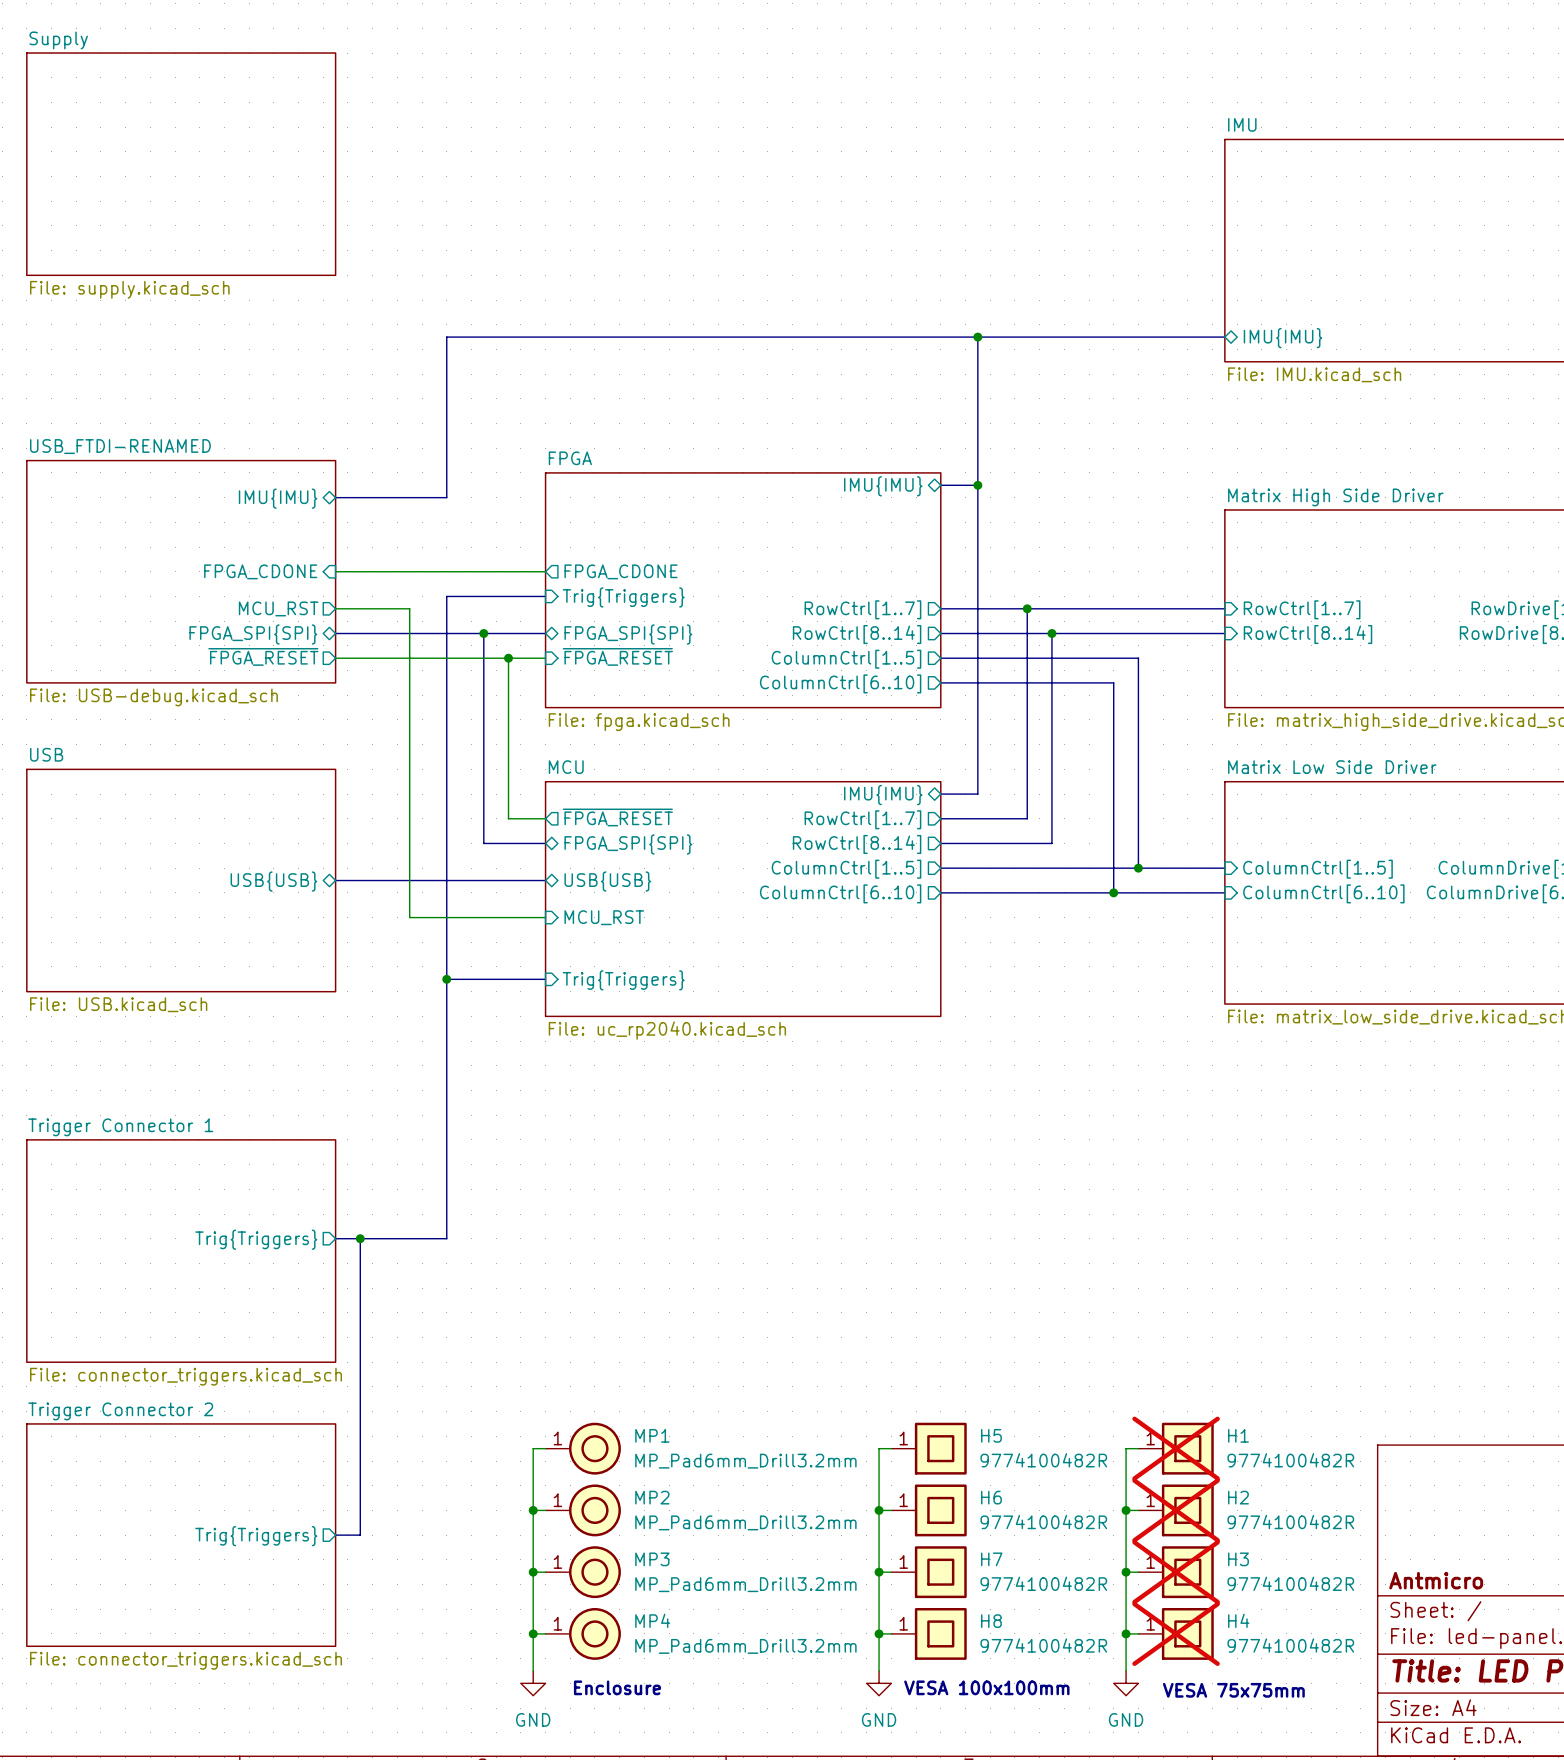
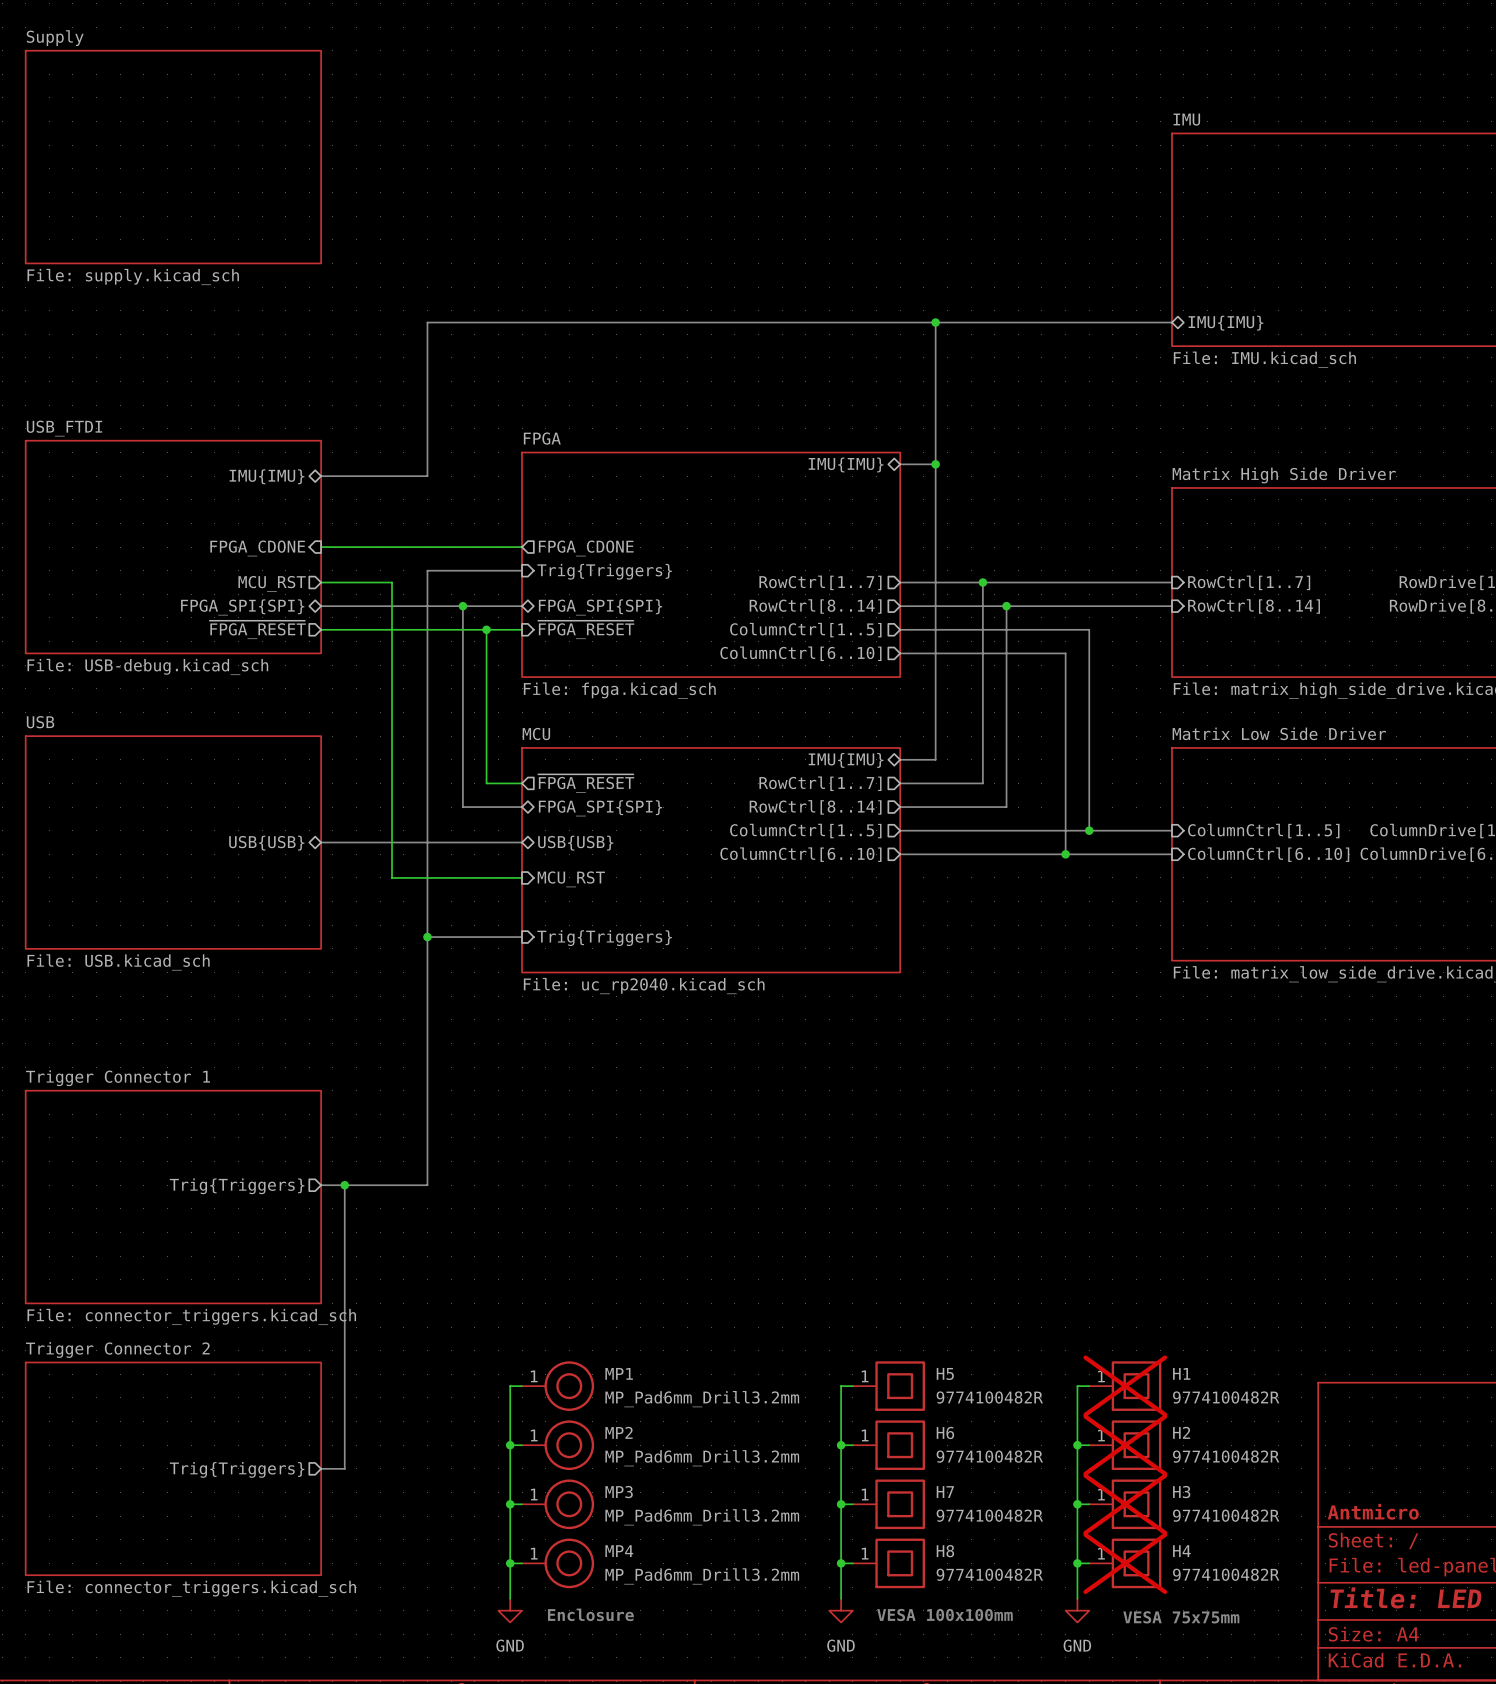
sheet USB_FTDI-RENAMED name: USB_FTDI-RENAMED (120, 446) -> USB_FTDI (64, 428)

